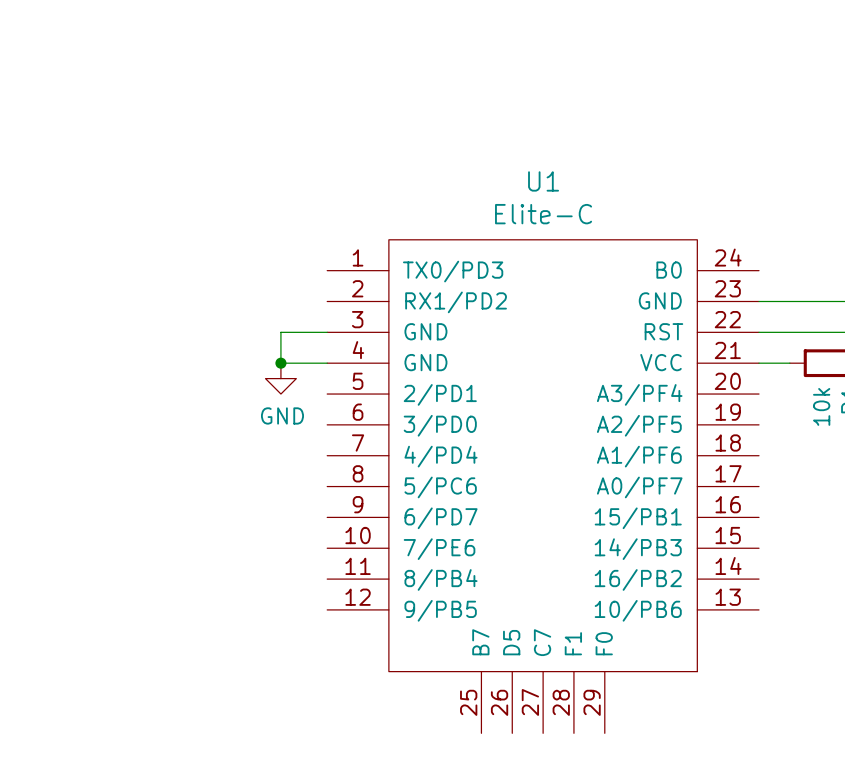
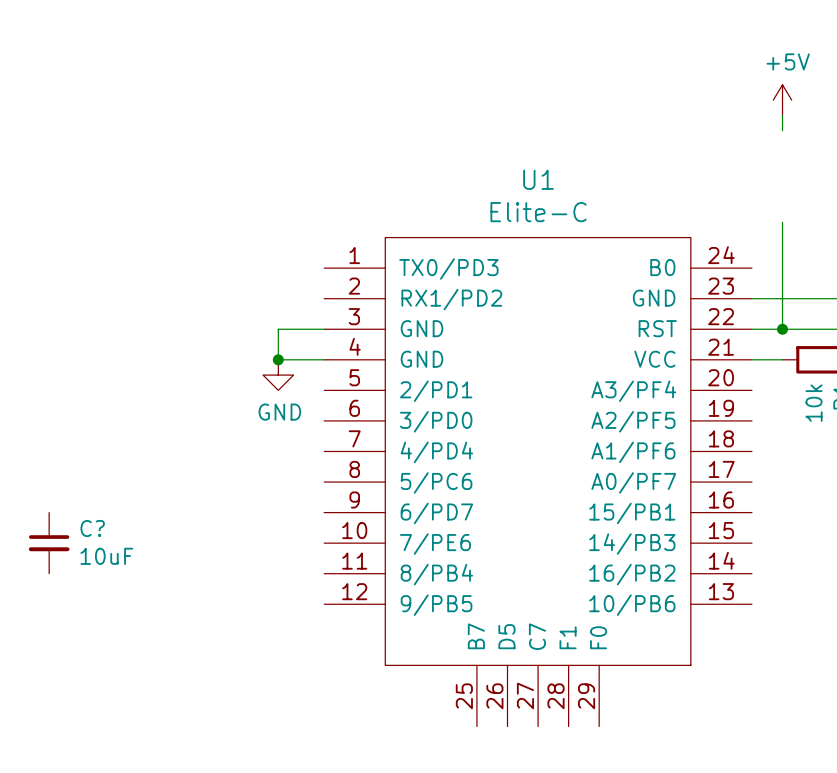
power symbol: none -> +5V (782, 100)
wire: none -> (782, 115) (782, 130)
wire: none -> (782, 222) (782, 329)
junction: none -> (782, 329)
C?: none -> 10uF (49, 543)

